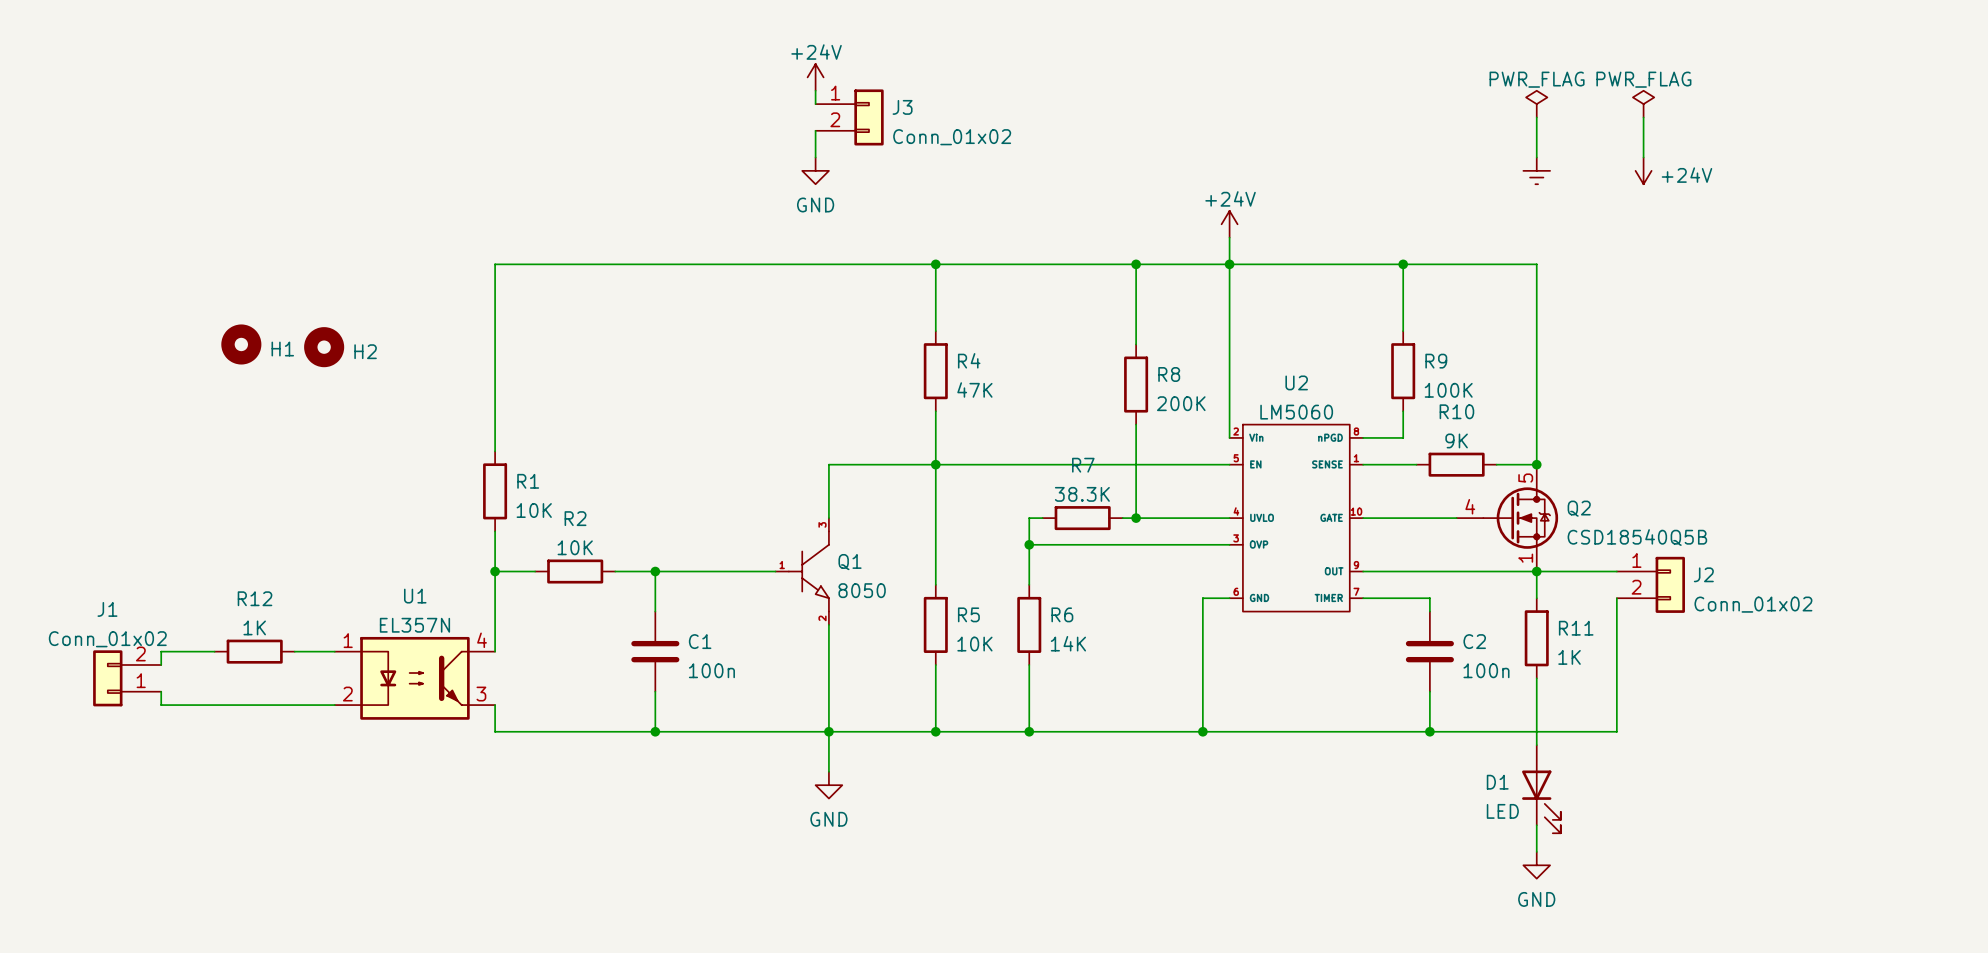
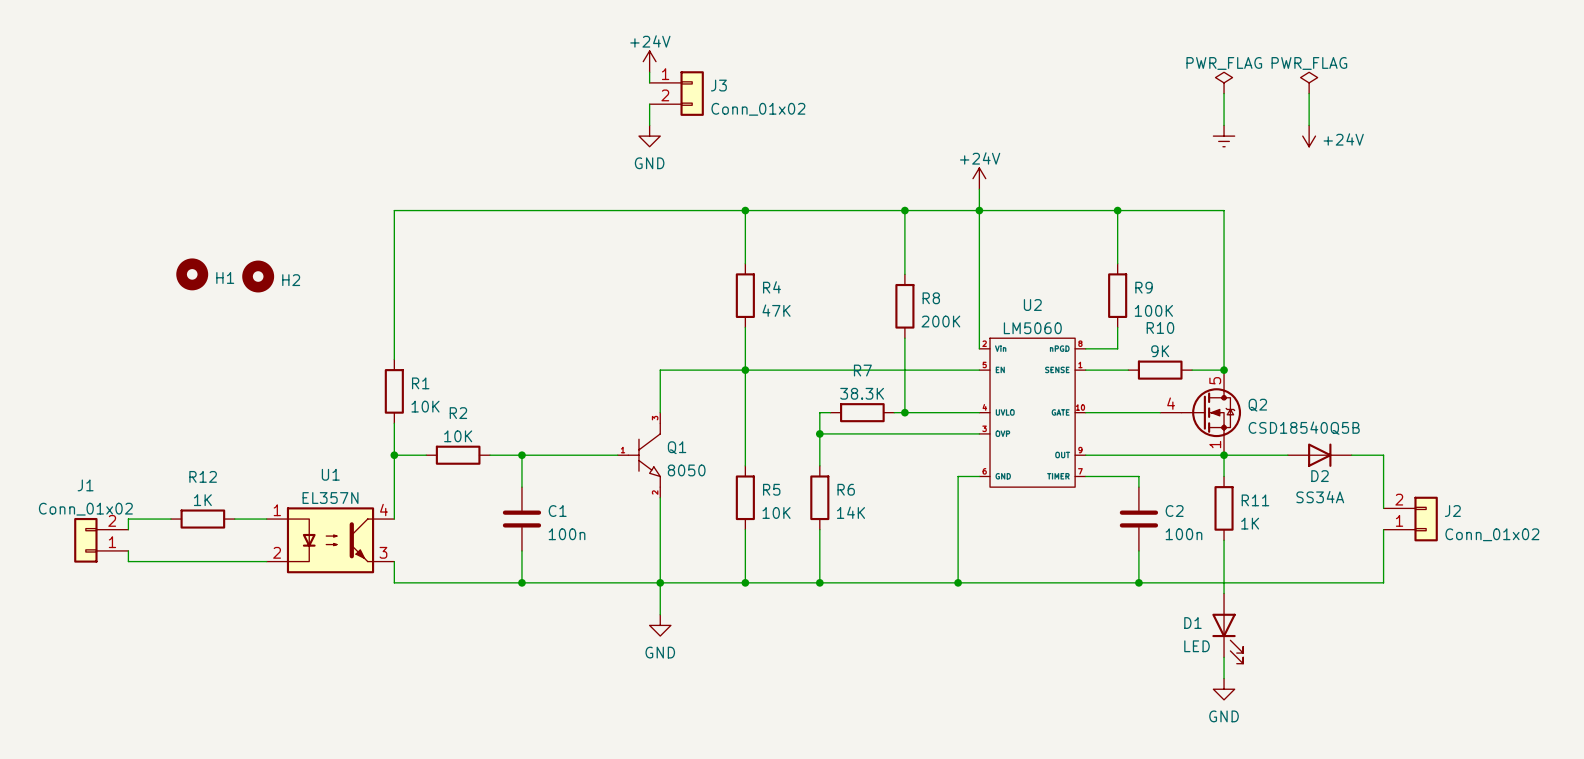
D2: none -> SS34A (1319, 455)
wire: none -> (1351, 455) (1383, 455) (1383, 508)
J2 position: (1650, 584) -> (1410, 519)
J2 flip: as is (1670, 584) -> up-down (1426, 519)
wire: (1616, 598) (1616, 731) -> (1383, 529) (1383, 582) (1287, 582)

